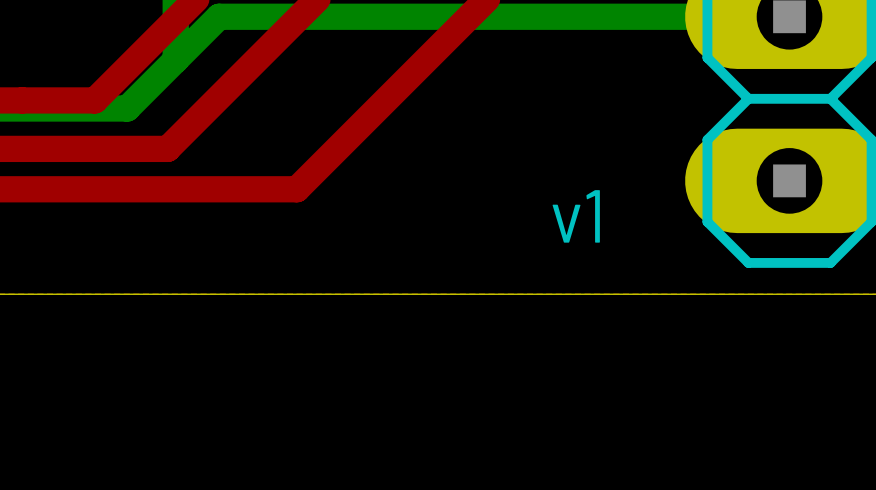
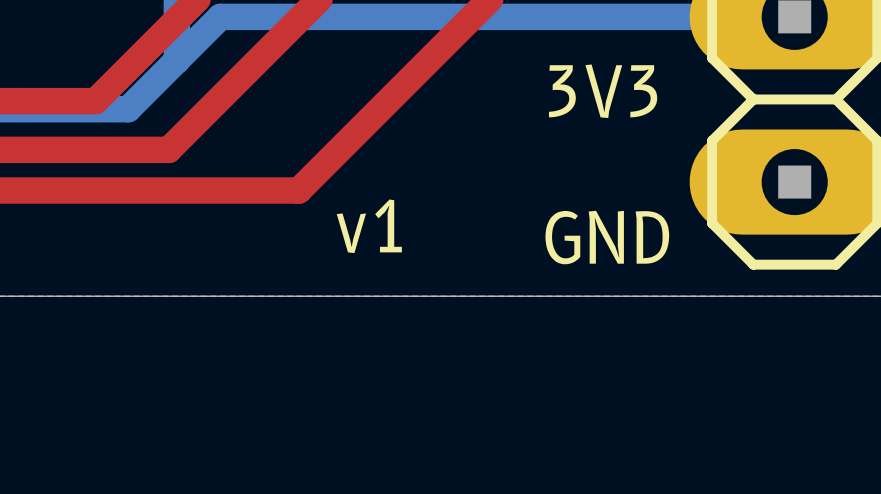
text: none -> 3V3 (603, 91)
text position: v1 (576, 216) -> v1 (369, 226)
text: none -> GND (607, 237)

